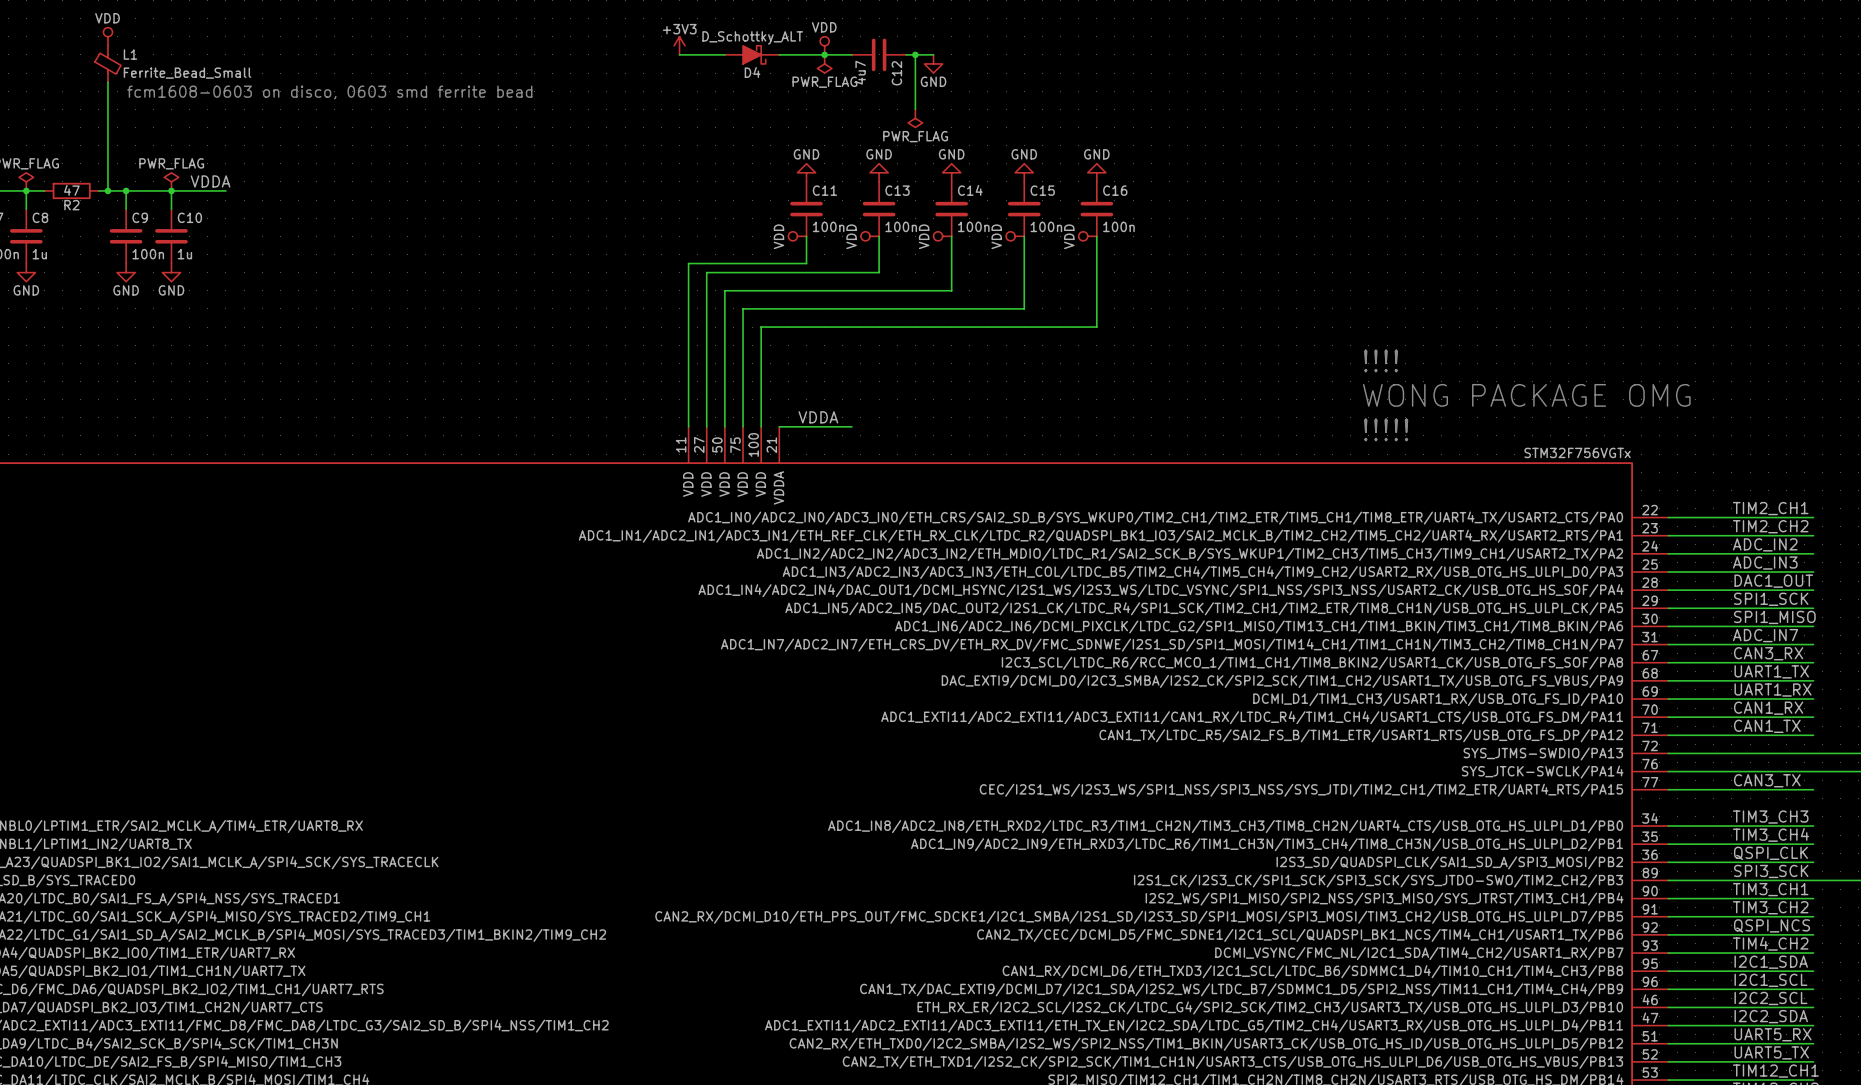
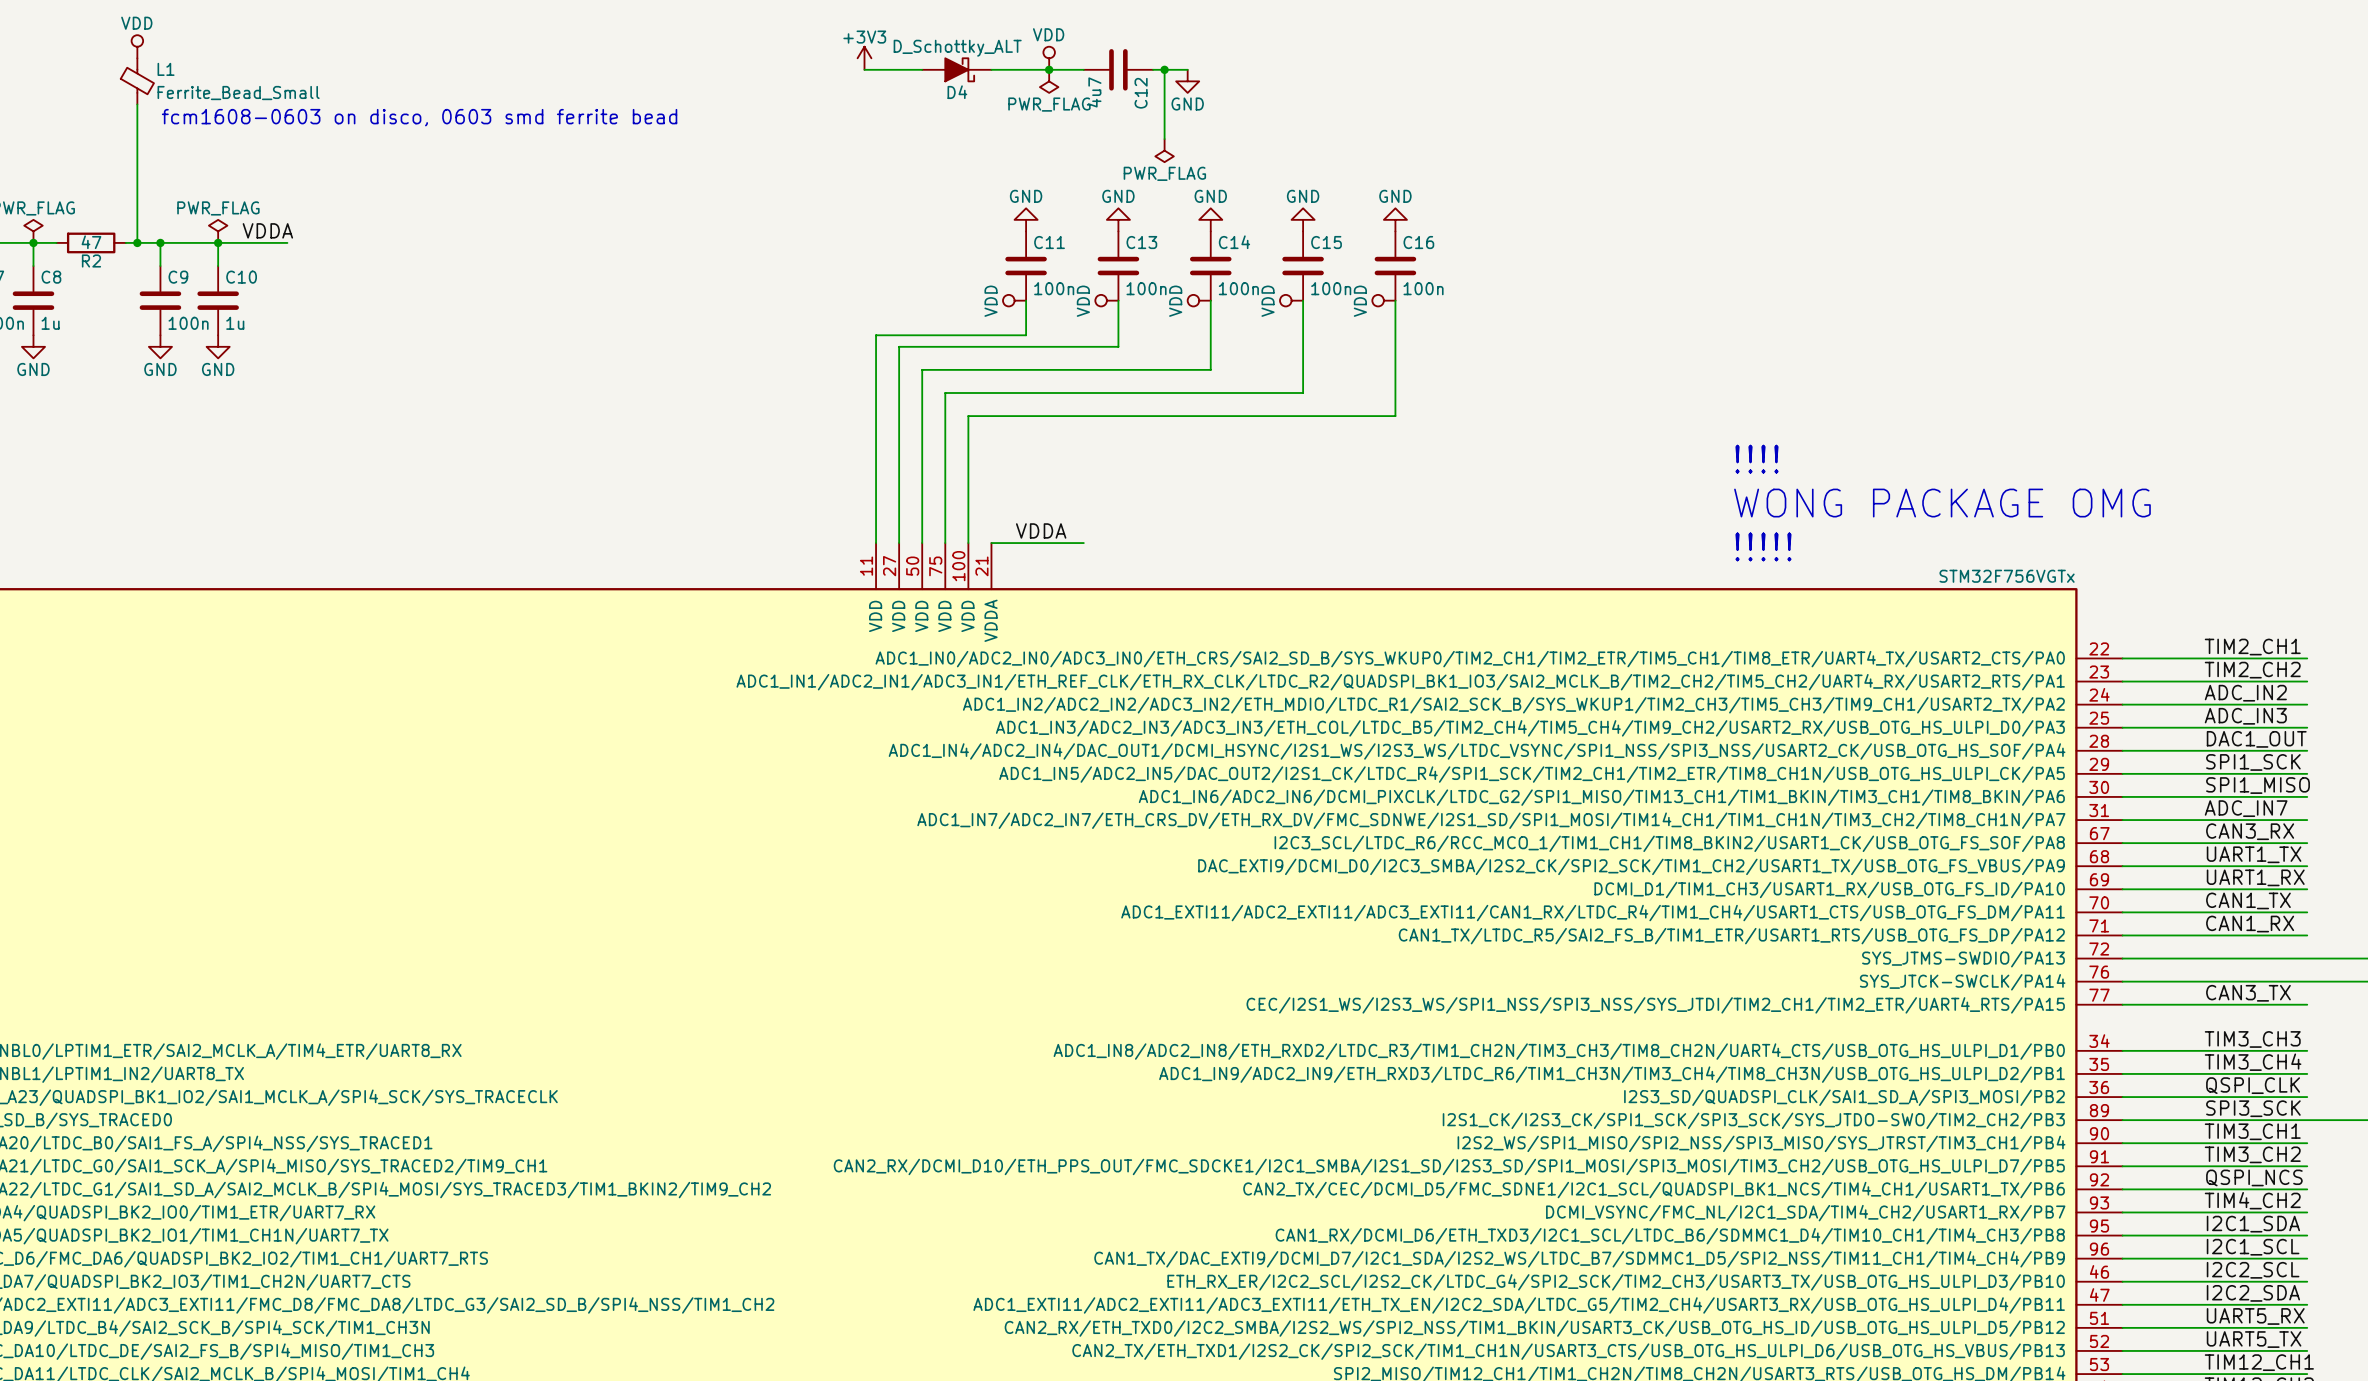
label: CAN1_RX (1768, 708) -> CAN1_TX (2248, 900)
label: CAN1_TX (1767, 726) -> CAN1_RX (2250, 924)

